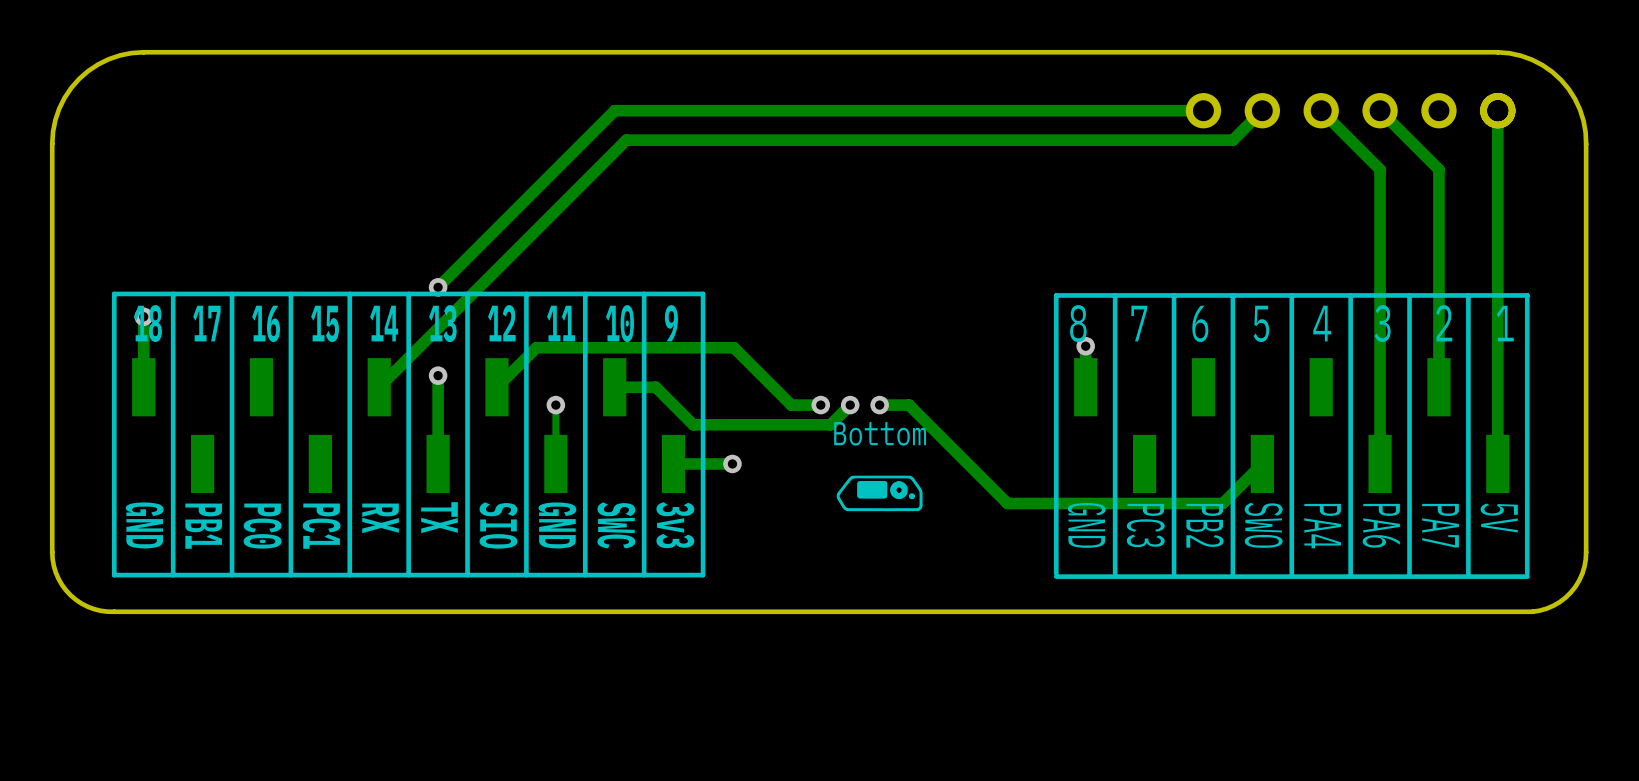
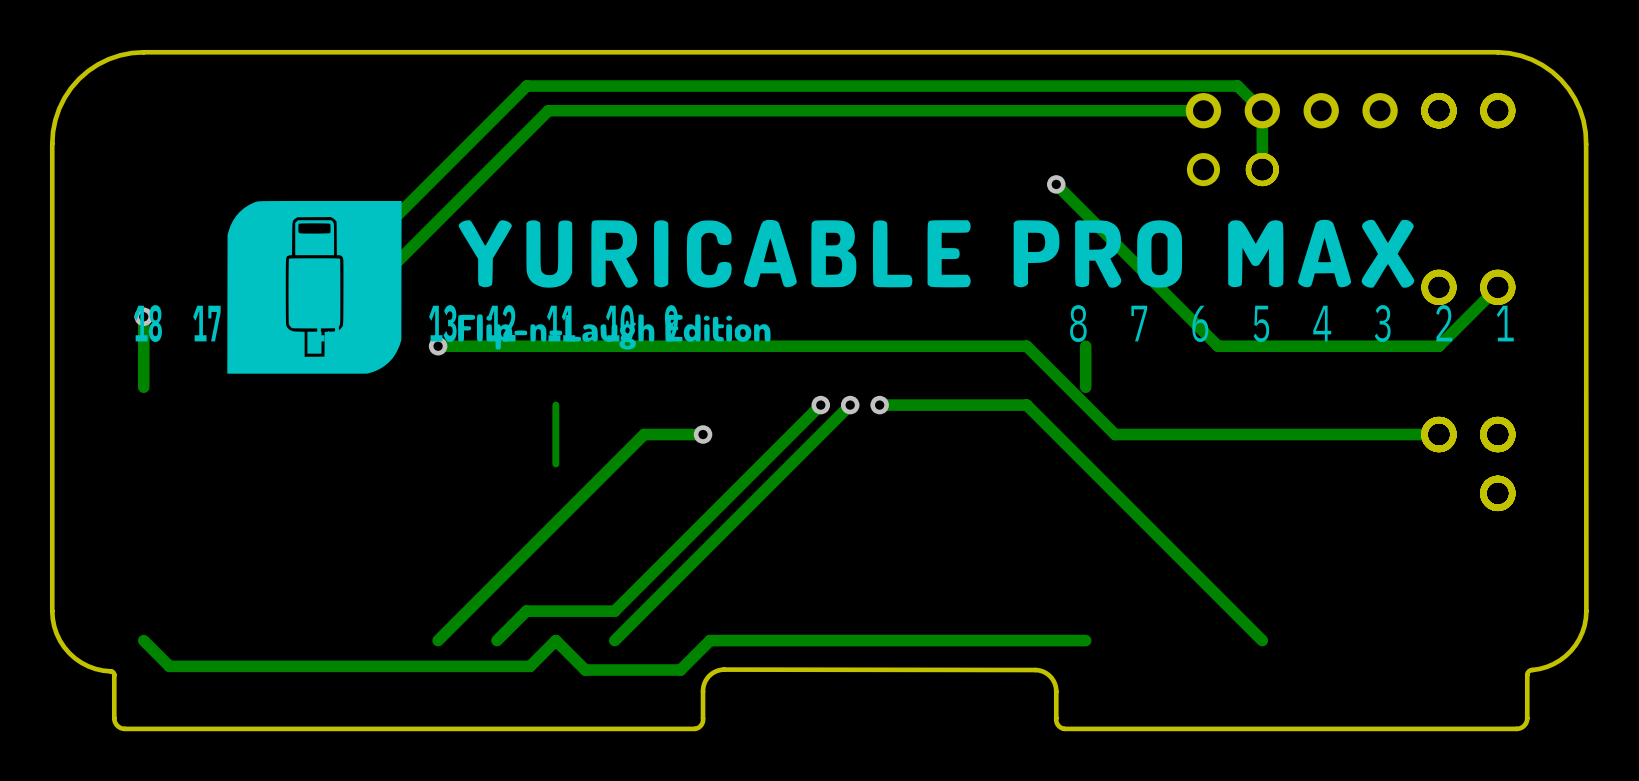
track: (614, 110) (438, 287) -> (614, 110) (548, 110) (370, 288)
track: (1262, 110) (1232, 140) (626, 140) (379, 387) -> none
track: (1321, 110) (1380, 169) (1380, 463) -> none
track: (1380, 110) (1438, 169) (1438, 387) -> none
track: (1497, 110) (1497, 463) -> none
board edge: (1586, 144) (1585, 559) (1582, 573) (1570, 592) (1559, 601) (1539, 610) (107, 611) (87, 606) (70, 595) (58, 578) (53, 565) (52, 552) -> (1586, 144) (1585, 618) (1579, 639) (1565, 656) (1553, 664) (1527, 672) (1527, 719) (1524, 725) (1518, 728) (1064, 728) (1059, 727) (1056, 721) (1054, 682) (1046, 673) (1037, 670) (724, 669) (712, 673) (704, 682) (702, 721) (700, 726) (694, 728) (123, 728) (117, 725) (114, 720) (113, 672) (95, 668) (81, 662) (64, 647) (56, 633) (52, 611) (52, 552)
part: none -> (1203, 169)
track: none -> (1262, 169) (1262, 110) (1237, 86) (526, 86) (370, 241)
part: none -> (1262, 169)
track: none -> (1056, 184) (1218, 346) (1438, 346) (1497, 287)
via: none -> (1056, 184)
drawing: none -> [227, 200, 1415, 374]
via: (438, 287) -> none
part: none -> (1438, 287)
part: none -> (1497, 287)
line: (173, 293) (173, 575) -> none
line: (232, 293) (232, 575) -> none
line: (290, 293) (290, 575) -> none
line: (349, 293) (349, 575) -> none
line: (408, 293) (408, 575) -> none
line: (467, 293) (467, 575) -> none
line: (526, 293) (526, 575) -> none
line: (585, 293) (585, 575) -> none
line: (644, 293) (644, 575) -> none
line: (703, 293) (114, 293) (114, 575) (703, 575) (703, 293) -> none
line: (1115, 295) (1115, 573) -> none
line: (1174, 295) (1174, 573) -> none
line: (1232, 295) (1232, 573) -> none
line: (1291, 295) (1291, 573) -> none
line: (1350, 295) (1350, 573) -> none
line: (1409, 295) (1409, 573) -> none
line: (1468, 295) (1468, 573) -> none
line: (1527, 295) (1056, 295) (1056, 573) -> none
line: (1527, 295) (1527, 573) -> none
track: none -> (438, 346) (1026, 346) (1115, 434) (1438, 434)
via: none -> (438, 346)
via: (1085, 346) -> none
track: (438, 375) (438, 463) -> none
via: (438, 375) -> none
track: (496, 387) (536, 347) (733, 347) (791, 405) (820, 405) -> (496, 640) (526, 611) (614, 611) (820, 405)
track: (614, 387) (655, 387) (693, 424) (830, 424) -> (614, 640) (830, 424)
via: (555, 405) -> none
track: (909, 405) (1007, 503) (1222, 503) (1262, 463) -> (909, 405) (1026, 405) (1262, 640)
part: (408, 425) -> none
part: (1291, 425) -> none
text: Bottom (880, 433) -> none
track: none -> (703, 434) (644, 434) (438, 640)
part: none -> (1438, 434)
part: none -> (1497, 434)
track: (732, 463) (673, 463) -> none
via position: (732, 463) -> (703, 434)
drawing: [836, 475, 923, 512] -> none
part: none -> (1497, 493)
text: TX (439, 517) -> none
text: 5V (1499, 517) -> none
text: RX (380, 518) -> none
text: GND (144, 525) -> none
text: SIO (498, 525) -> none
text: GND (557, 525) -> none
text: SWC (616, 525) -> none
text: 3v3 (675, 525) -> none
text: GND (1086, 525) -> none
text: PC3 (1145, 525) -> none
text: PB2 (1205, 525) -> none
text: SWO (1263, 525) -> none
text: PA6 (1381, 525) -> none
text: PA7 (1440, 525) -> none
text: PB1 (203, 526) -> none
text: PC0 (262, 526) -> none
text: PC1 (321, 526) -> none
text: PA4 (1322, 526) -> none
line: (1527, 576) (1056, 576) -> none
track: none -> (1085, 640) (710, 640) (680, 670) (585, 670) (555, 640) (530, 666) (169, 666) (143, 640)

